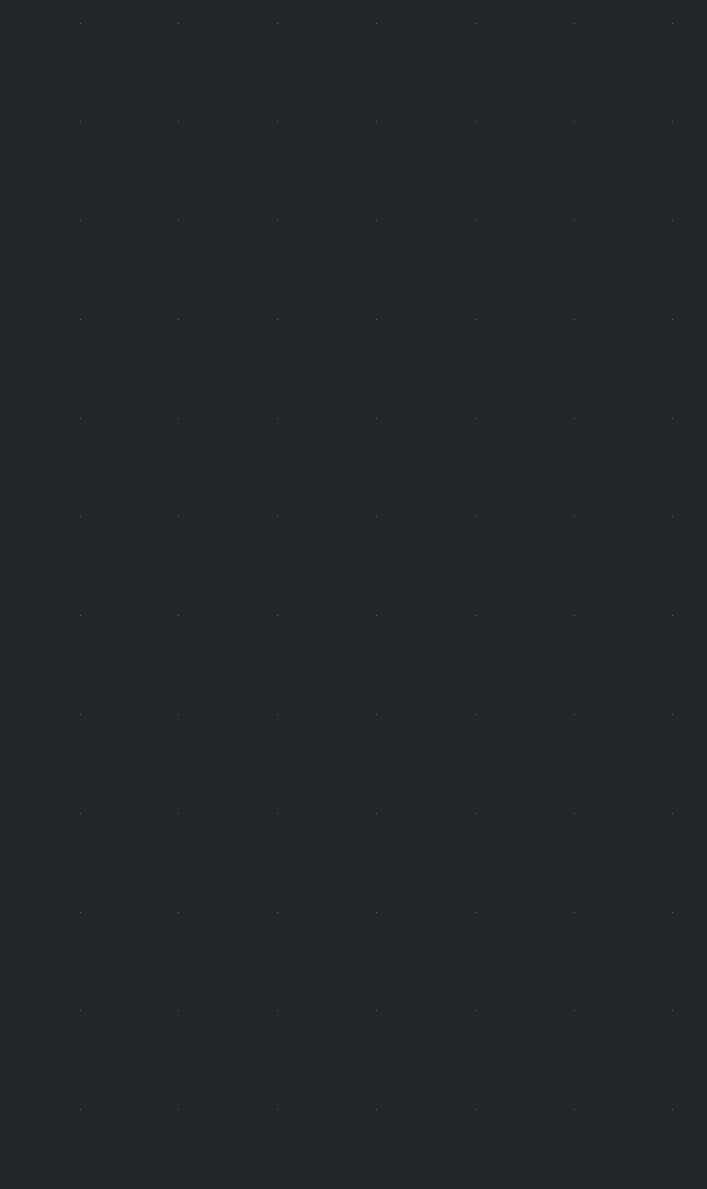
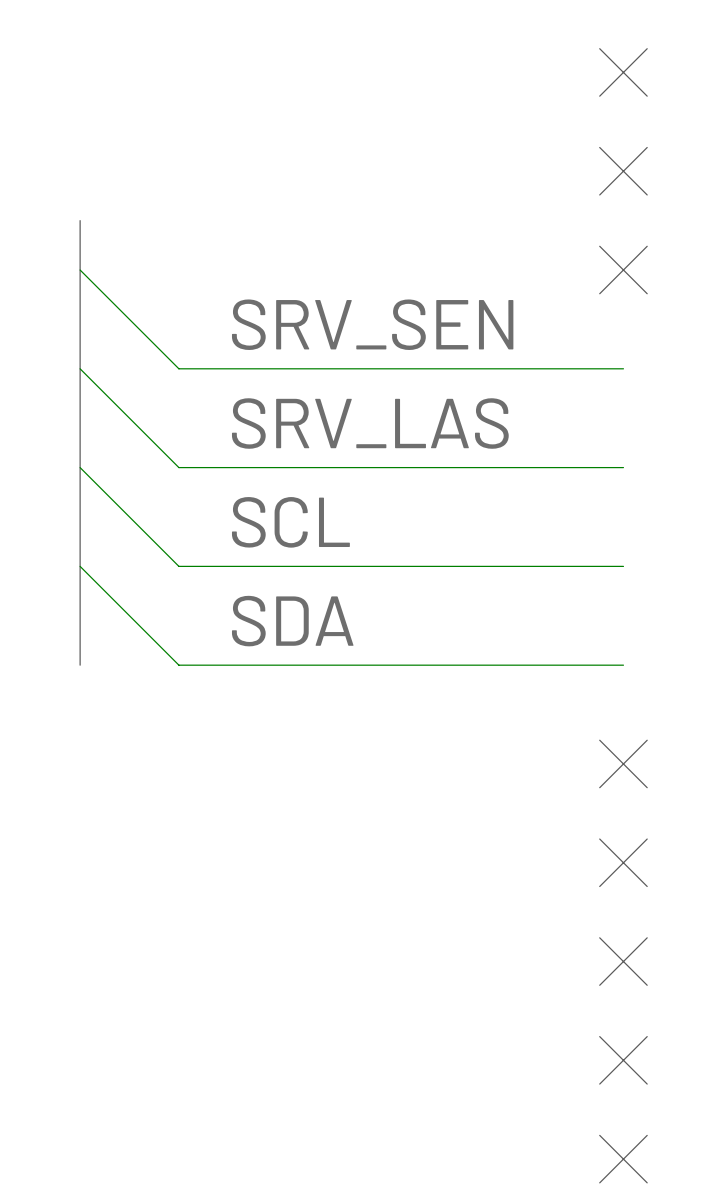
no-connect mark: none -> (623, 72)
no-connect mark: none -> (623, 171)
bus: none -> (80, 220) (80, 665)
wire: none -> (80, 270) (178, 368) (623, 368)
no-connect mark: none -> (623, 270)
label: none -> SRV_SEN (372, 324)
wire: none -> (80, 368) (178, 467) (623, 467)
label: none -> SRV_LAS (370, 423)
wire: none -> (80, 467) (178, 566) (623, 566)
label: none -> SCL (290, 522)
wire: none -> (80, 566) (178, 665) (623, 665)
label: none -> SDA (292, 621)
no-connect mark: none -> (623, 763)
no-connect mark: none -> (623, 862)
no-connect mark: none -> (623, 961)
no-connect mark: none -> (623, 1060)
no-connect mark: none -> (623, 1159)

